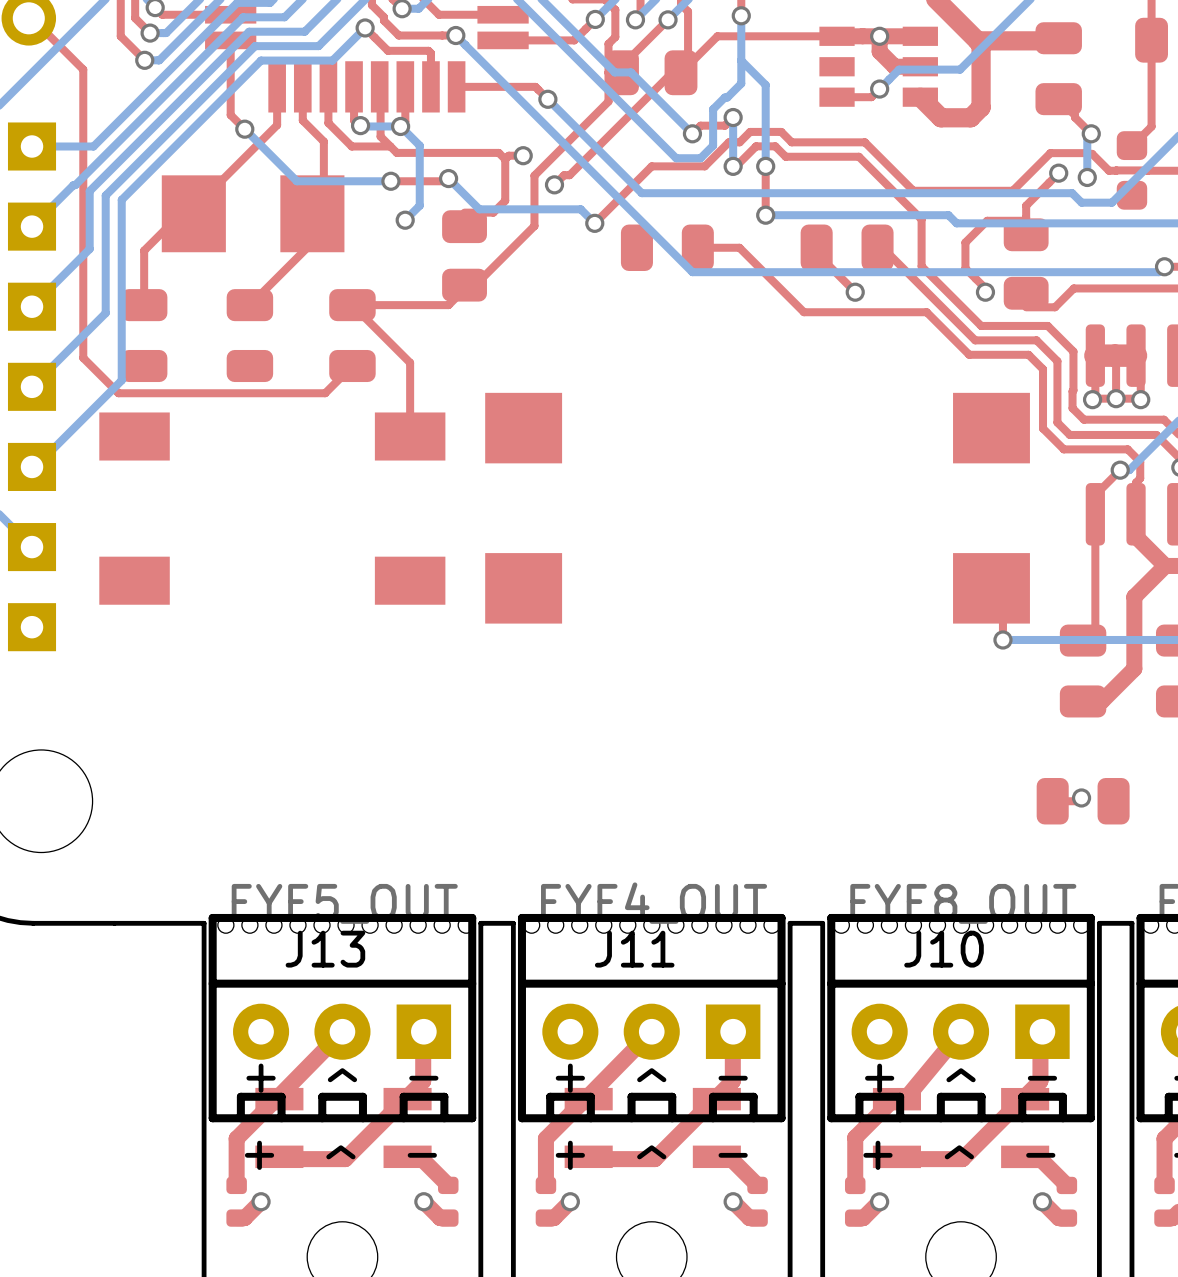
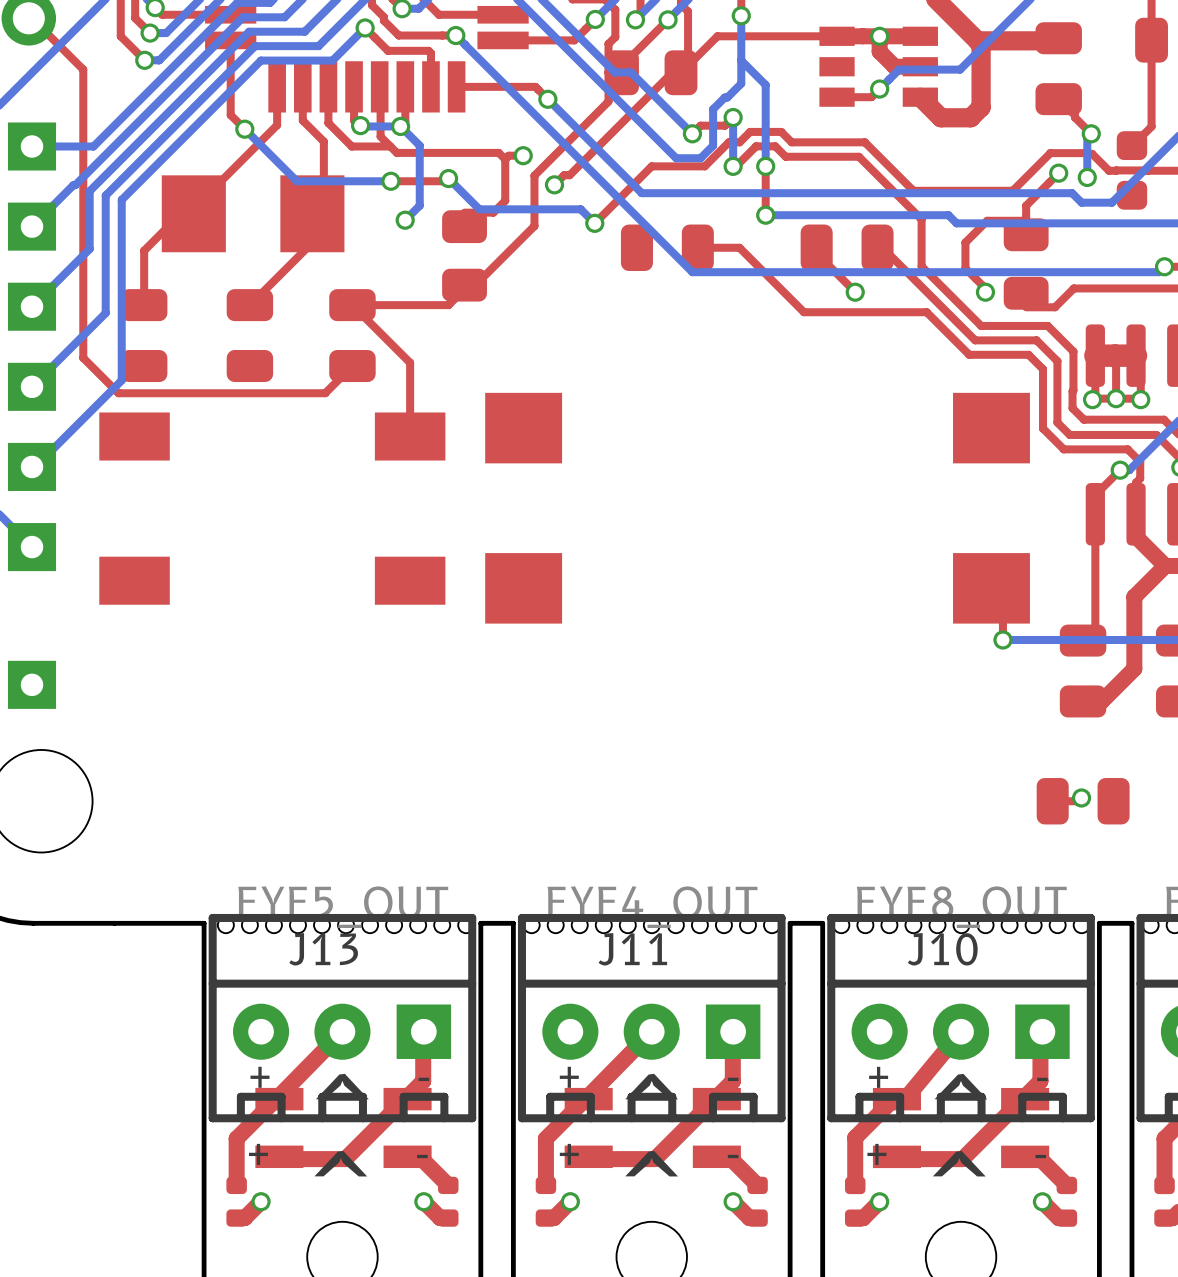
part position: (32, 627) -> (32, 684)

